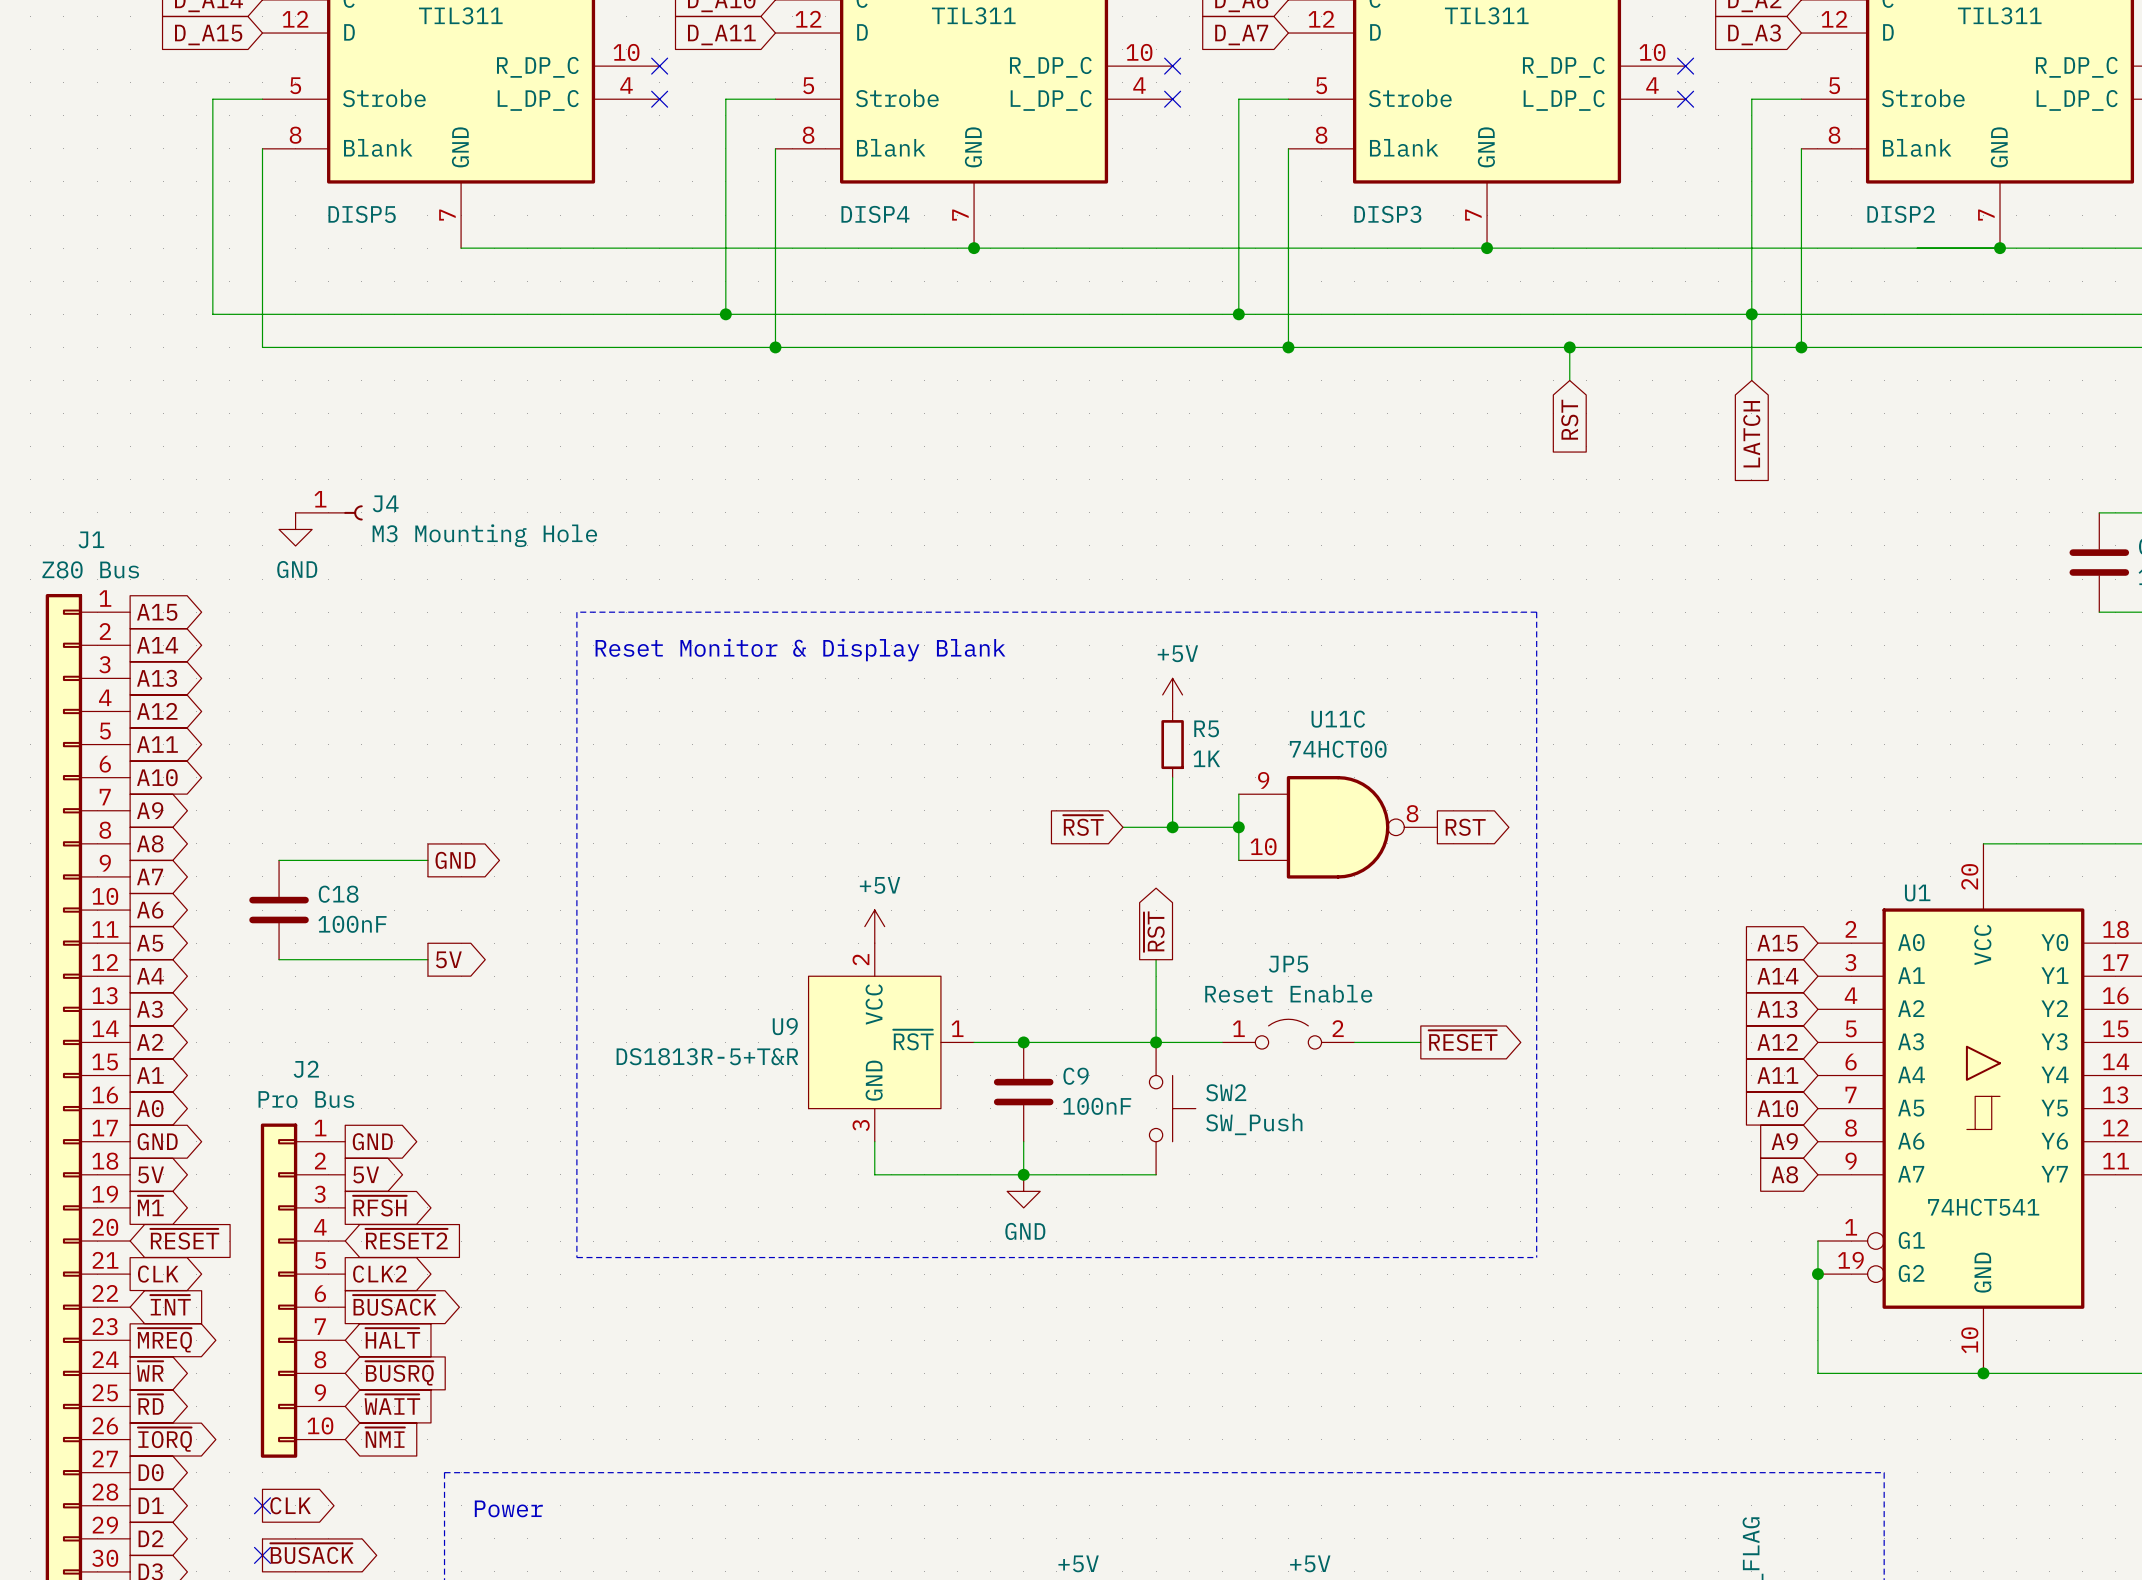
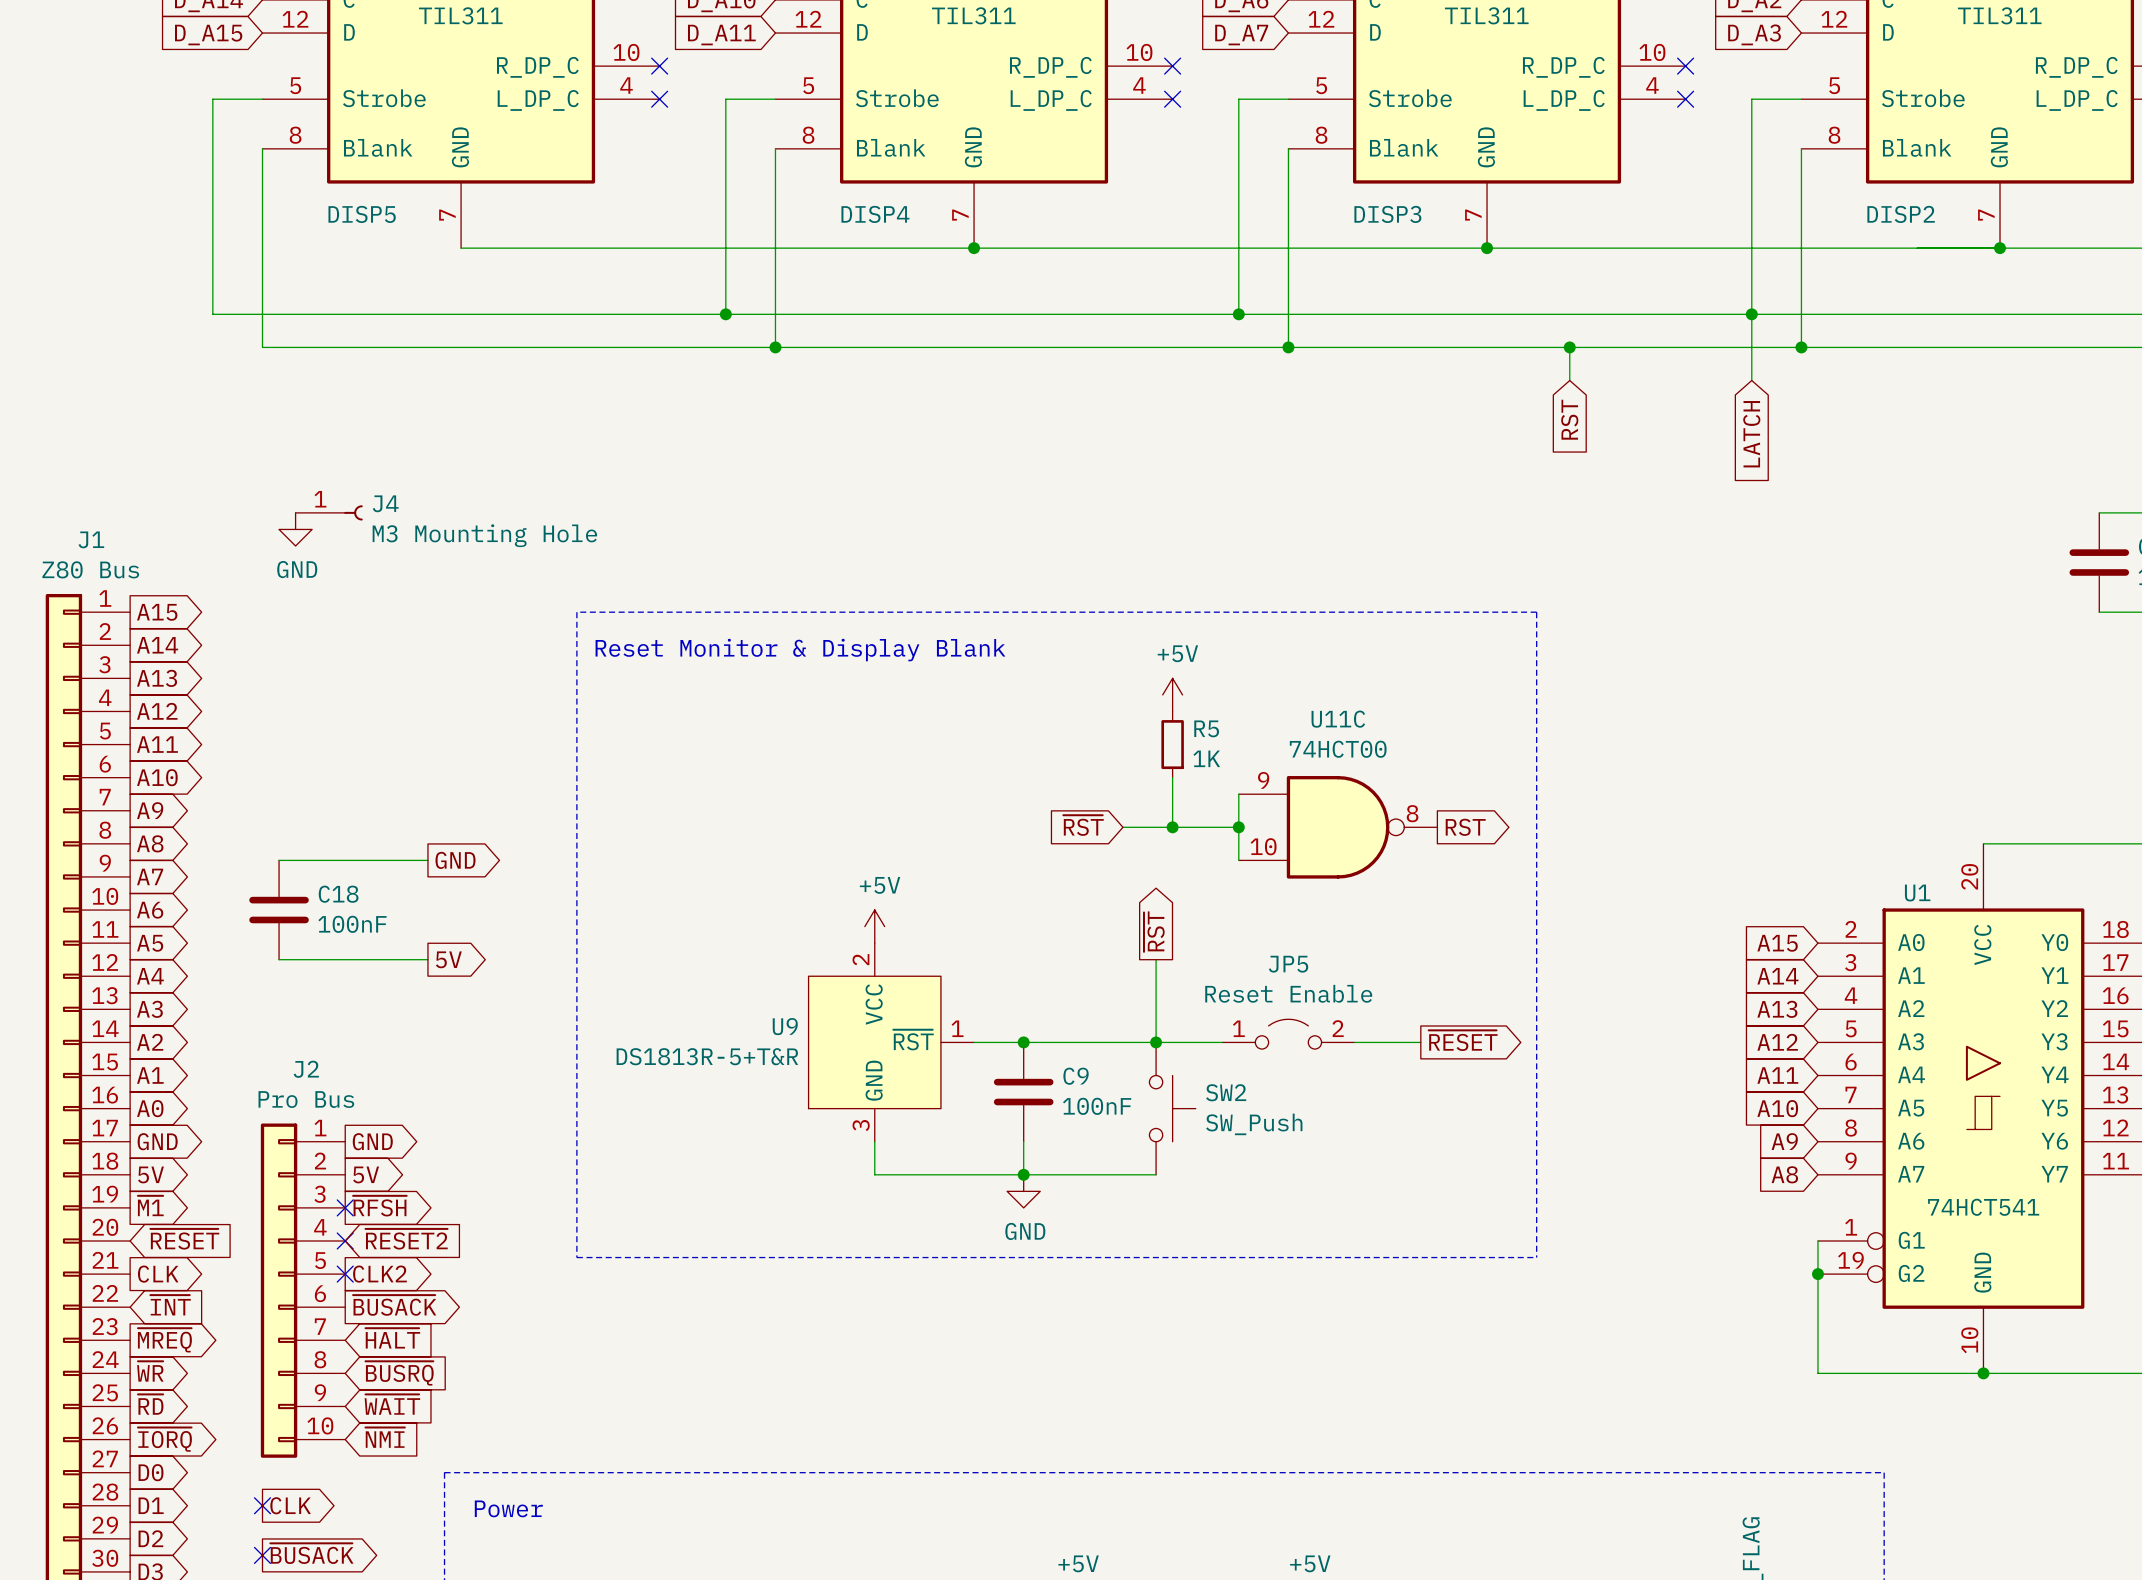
no-connect mark: none -> (345, 1207)
no-connect mark: none -> (345, 1241)
no-connect mark: none -> (345, 1274)

